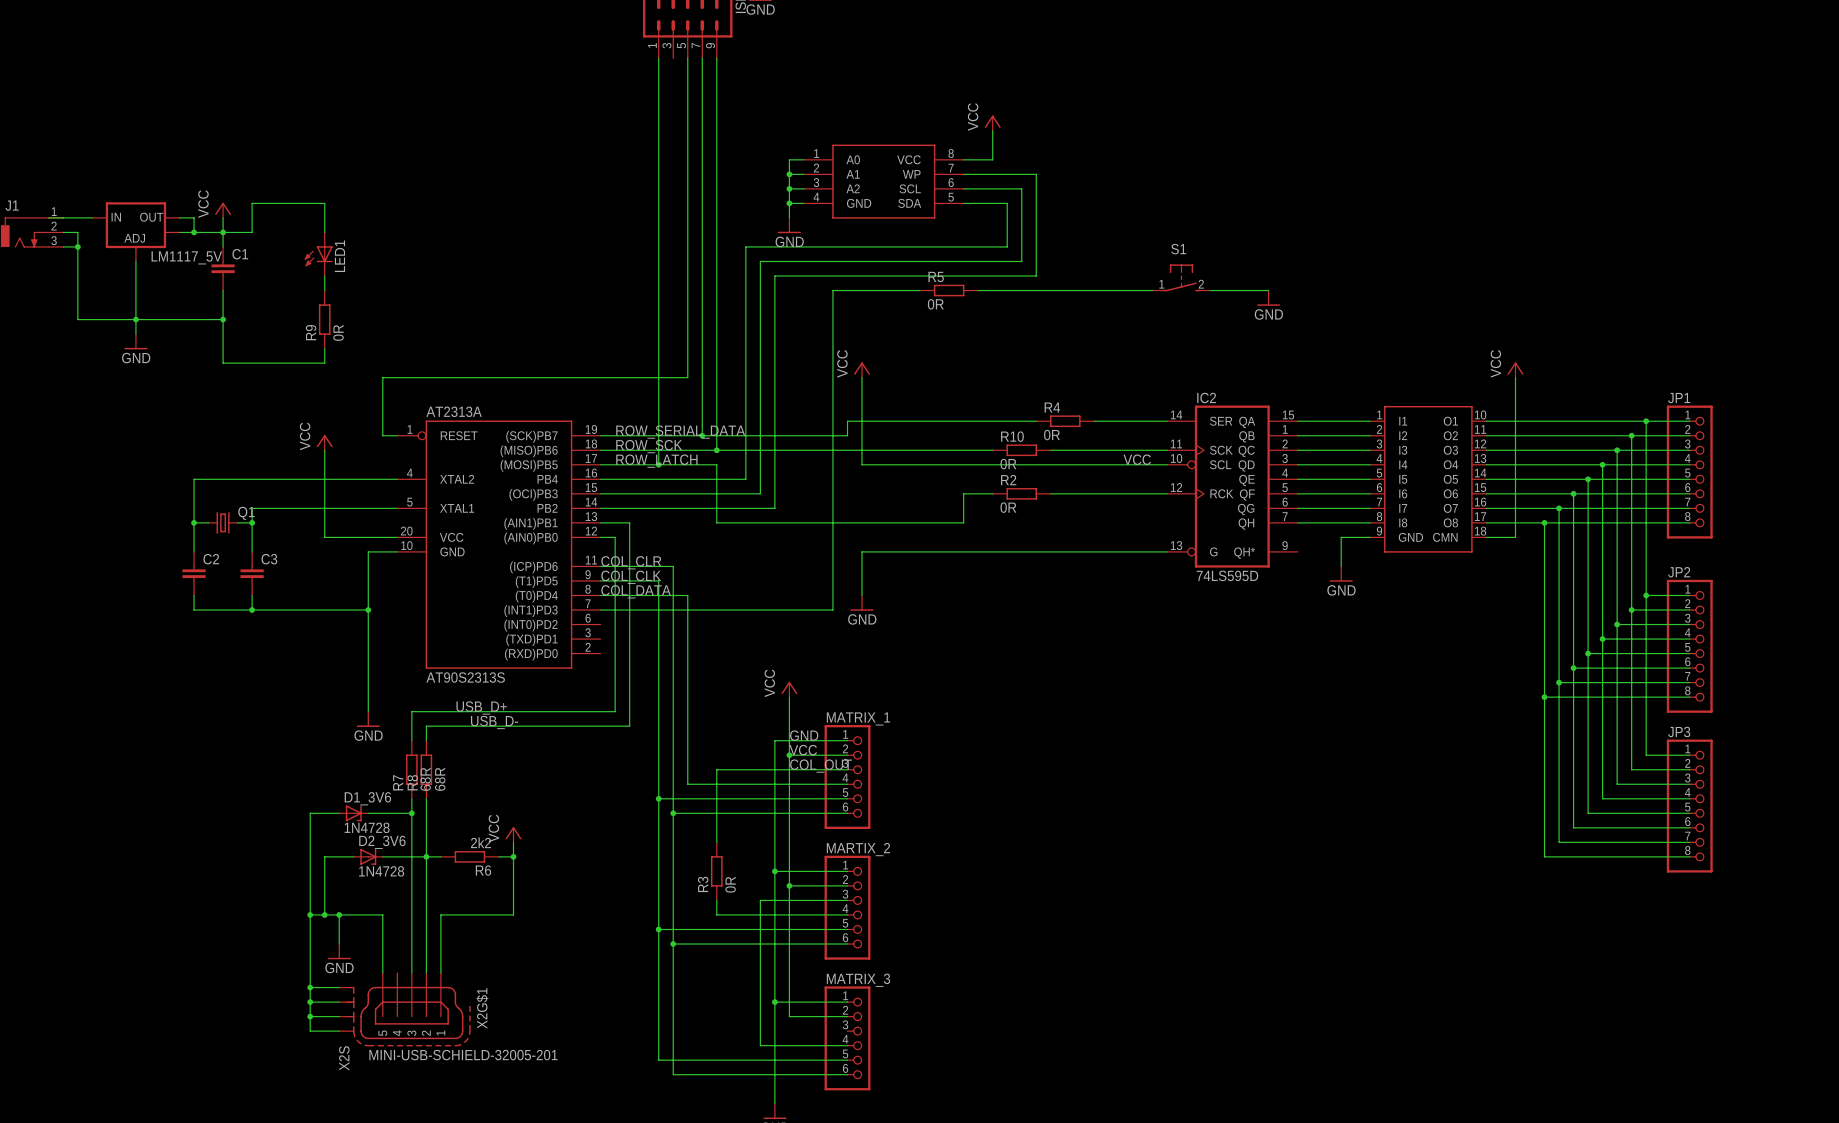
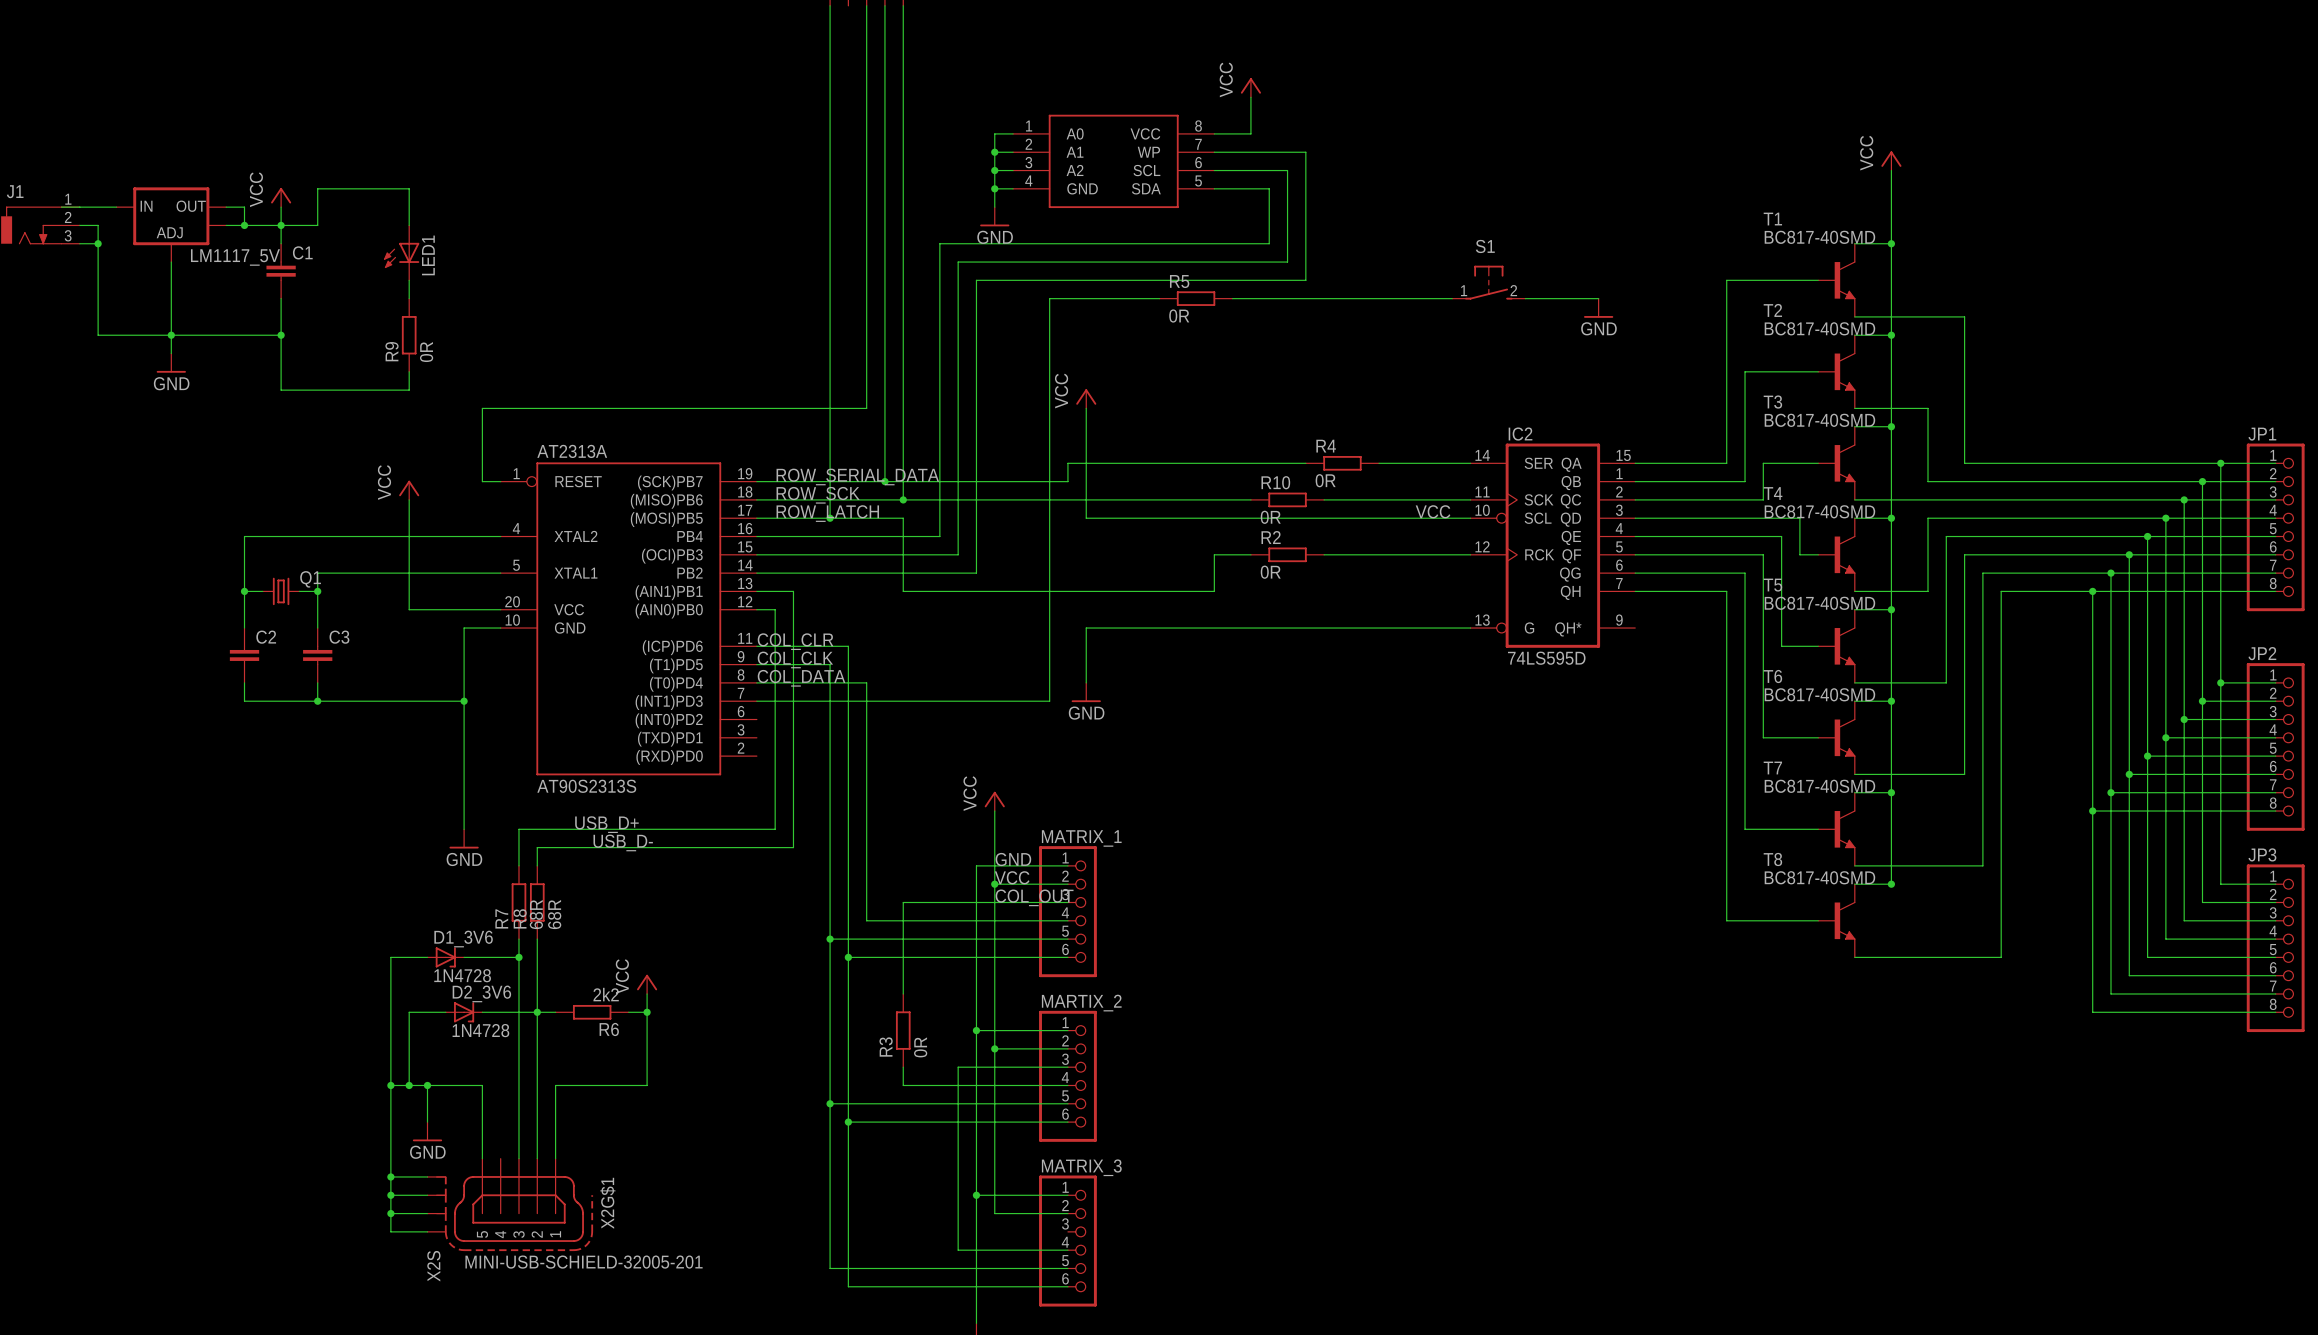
power symbol: none -> VCC (1891, 160)
wire: none -> (1891, 170) (1891, 884) (1854, 884)
wire: none -> (1854, 243) (1891, 243)
junction: none -> (1891, 243)
wire: none -> (1818, 280) (1726, 280) (1726, 463)
T1: none -> BC817-40SMD (1836, 280)
wire: none -> (1854, 335) (1891, 335)
junction: none -> (1891, 335)
wire: none -> (1818, 371) (1745, 371) (1745, 481) (1726, 481)
T2: none -> BC817-40SMD (1836, 371)
power symbol: VCC (1515, 370) -> none
wire: (1515, 377) (1515, 537) (1500, 537) -> none
junction: none -> (1891, 426)
wire: none -> (1818, 463) (1763, 463) (1763, 499) (1726, 499)
T3: none -> BC817-40SMD (1836, 463)
wire: (1486, 421) (1559, 421) -> (1854, 316) (1964, 316) (1964, 463)
wire: (1646, 421) (1646, 755) (1689, 755) -> (2220, 463) (2220, 884) (2275, 884)
junction: (1646, 421) -> none
wire: none -> (2129, 463) (2275, 463)
junction: none -> (2220, 463)
wire: (1486, 435) (1530, 435) -> (1854, 408) (1928, 408) (1928, 481)
wire: (1631, 435) (1631, 769) (1689, 769) -> (2202, 481) (2202, 902) (2275, 902)
junction: (1631, 435) -> none
wire: none -> (2129, 481) (2275, 481)
junction: none -> (2202, 481)
wire: (1617, 450) (1617, 784) (1689, 784) -> (2184, 499) (2184, 920) (2275, 920)
junction: (1617, 450) -> none
wire: none -> (2129, 499) (2275, 499)
junction: none -> (2184, 499)
wire: none -> (1726, 518) (1799, 518) (1799, 554) (1818, 554)
wire: (1500, 464) (1530, 464) -> (1854, 426) (1891, 426)
junction: none -> (1891, 518)
wire: (1602, 464) (1602, 798) (1689, 798) -> (2165, 518) (2165, 939) (2275, 939)
junction: (1602, 464) -> none
wire: none -> (2129, 518) (2275, 518)
junction: none -> (2165, 518)
JP1 position: (1689, 472) -> (2275, 527)
wire: none -> (1726, 536) (1781, 536) (1781, 646) (1818, 646)
part: (1428, 479) -> none
wire: (1486, 479) (1544, 479) -> (1946, 591) (1946, 536)
wire: (1588, 479) (1588, 522) (1530, 522) -> (1928, 518) (1928, 591)
junction: (1588, 479) -> none
wire: none -> (2129, 536) (2275, 536)
wire: none -> (2147, 536) (2147, 957) (2275, 957)
junction: none -> (2147, 536)
wire: none -> (1726, 554) (1763, 554) (1763, 737) (1818, 737)
T4: none -> BC817-40SMD (1836, 554)
wire: (1486, 493) (1559, 493) -> (1964, 573) (1964, 554)
wire: (1573, 493) (1573, 508) (1486, 508) -> none
junction: (1573, 493) -> none
junction: none -> (2129, 554)
wire: none -> (2275, 554) (2129, 554) (2129, 975) (2275, 975)
wire: none -> (1726, 573) (1745, 573) (1745, 829) (1818, 829)
junction: (1559, 508) -> none
junction: none -> (2110, 573)
wire: none -> (2129, 573) (2275, 573)
wire: none -> (1726, 591) (1726, 920) (1818, 920)
junction: (1544, 522) -> none
junction: none -> (2092, 591)
wire: none -> (2129, 591) (2275, 591)
wire: (1370, 537) (1341, 537) (1341, 566) -> none
junction: none -> (1891, 609)
T5: none -> BC817-40SMD (1836, 646)
power symbol: GND (1341, 574) -> none
wire: none -> (1854, 682) (1946, 682)
wire: (1544, 595) (1544, 856) (1660, 856) -> (2092, 591) (2092, 1012)
wire: (1646, 595) (1689, 595) -> (2220, 682) (2275, 682)
junction: (1646, 595) -> none
junction: none -> (2220, 682)
wire: none -> (1854, 701) (1891, 701)
junction: none -> (1891, 701)
wire: (1631, 610) (1689, 610) -> (2202, 701) (2275, 701)
junction: (1631, 610) -> none
junction: none -> (2202, 701)
wire: (1617, 624) (1689, 624) -> (2184, 719) (2275, 719)
junction: (1617, 624) -> none
junction: none -> (2184, 719)
T6: none -> BC817-40SMD (1836, 737)
wire: (1602, 639) (1689, 639) -> (2165, 737) (2275, 737)
junction: (1602, 639) -> none
junction: none -> (2165, 737)
JP2 position: (1689, 646) -> (2275, 746)
wire: (1588, 653) (1689, 653) -> (2147, 756) (2275, 756)
junction: (1588, 653) -> none
junction: none -> (2147, 756)
wire: none -> (1854, 774) (1964, 774)
wire: (1559, 668) (1559, 842) (1675, 842) -> (2110, 573) (2110, 993)
wire: (1573, 668) (1689, 668) -> (2275, 774) (2129, 774)
junction: (1573, 668) -> none
junction: none -> (2129, 774)
wire: none -> (1854, 792) (1891, 792)
junction: none -> (1891, 792)
wire: (1559, 682) (1675, 682) -> (2129, 792) (2275, 792)
junction: (1559, 682) -> none
junction: none -> (2110, 792)
wire: (1544, 697) (1660, 697) -> none
junction: (1544, 697) -> none
junction: none -> (2092, 811)
wire: none -> (2129, 811) (2275, 811)
T7: none -> BC817-40SMD (1836, 829)
wire: (1573, 740) (1573, 827) (1689, 827) -> (1982, 865) (1854, 865)
junction: none -> (1891, 884)
T8: none -> BC817-40SMD (1836, 920)
JP3 position: (1689, 806) -> (2275, 948)
wire: (1588, 813) (1689, 813) -> (2001, 957) (1854, 957)
wire: none -> (2129, 993) (2275, 993)
wire: none -> (2129, 1012) (2275, 1012)

